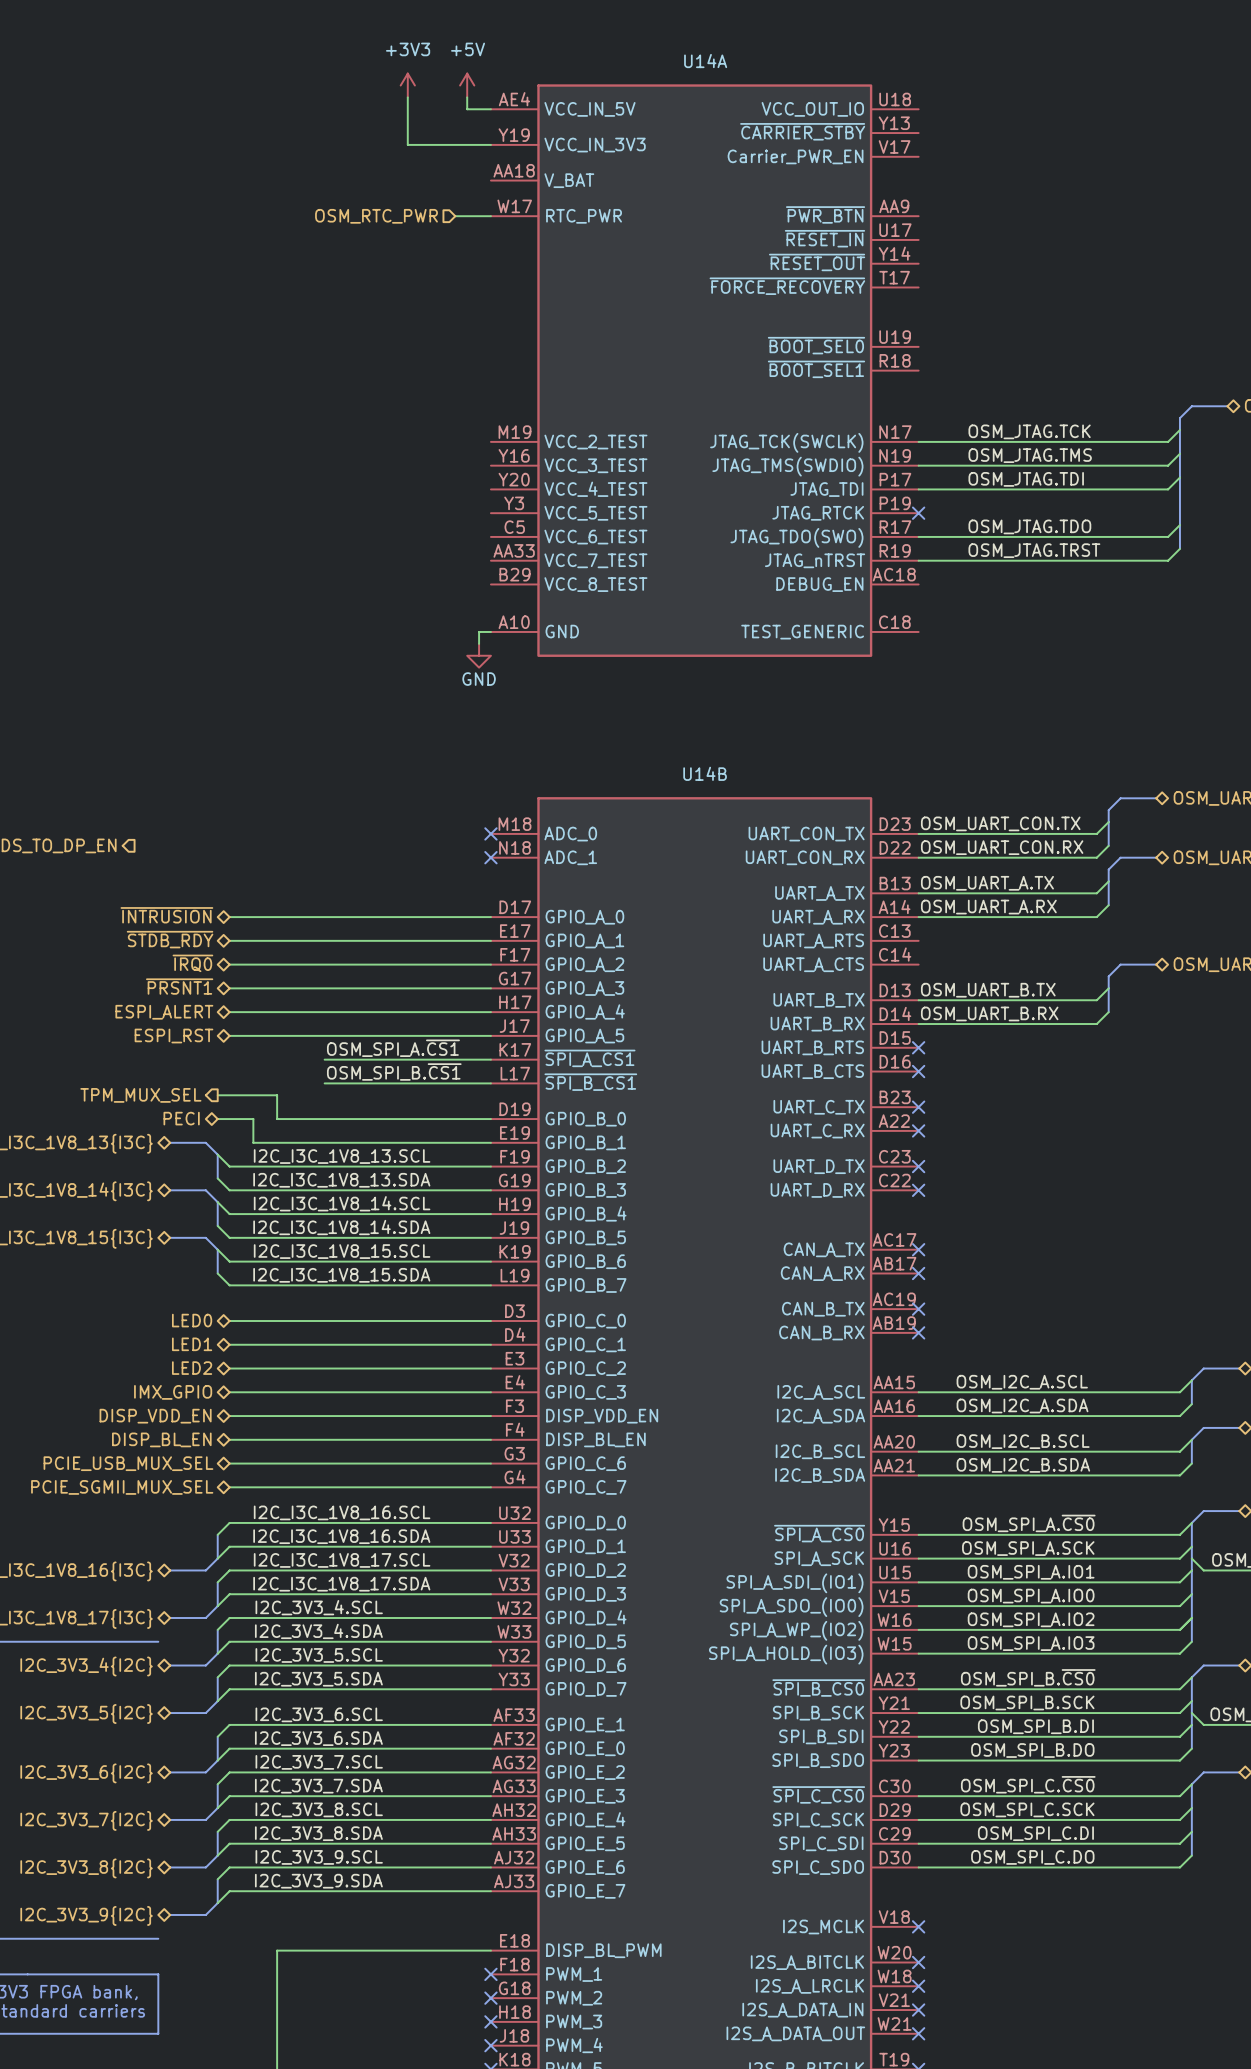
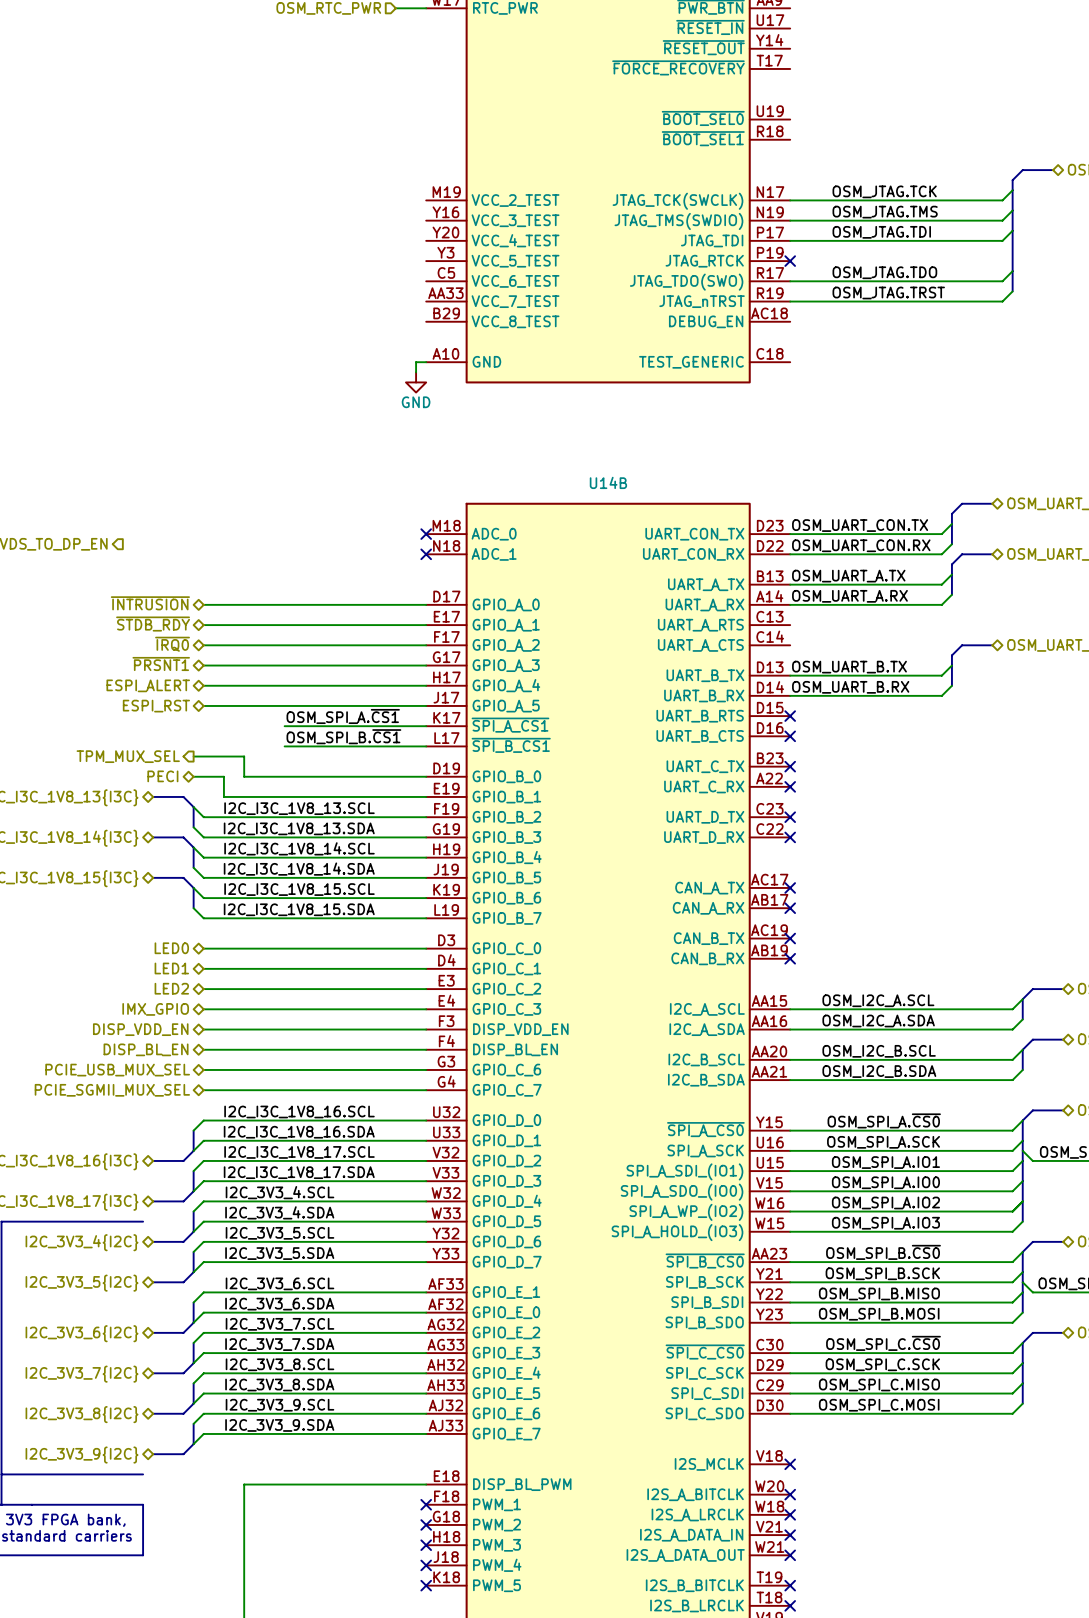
label: OSM_SPI_B.DI (1035, 1726) -> OSM_SPI_B.MISO (879, 1293)
label: OSM_SPI_B.DO (1032, 1750) -> OSM_SPI_B.MOSI (879, 1314)
label: OSM_SPI_C.DI (1035, 1833) -> OSM_SPI_C.MISO (879, 1384)
label: OSM_SPI_C.DO (1032, 1857) -> OSM_SPI_C.MOSI (879, 1405)

